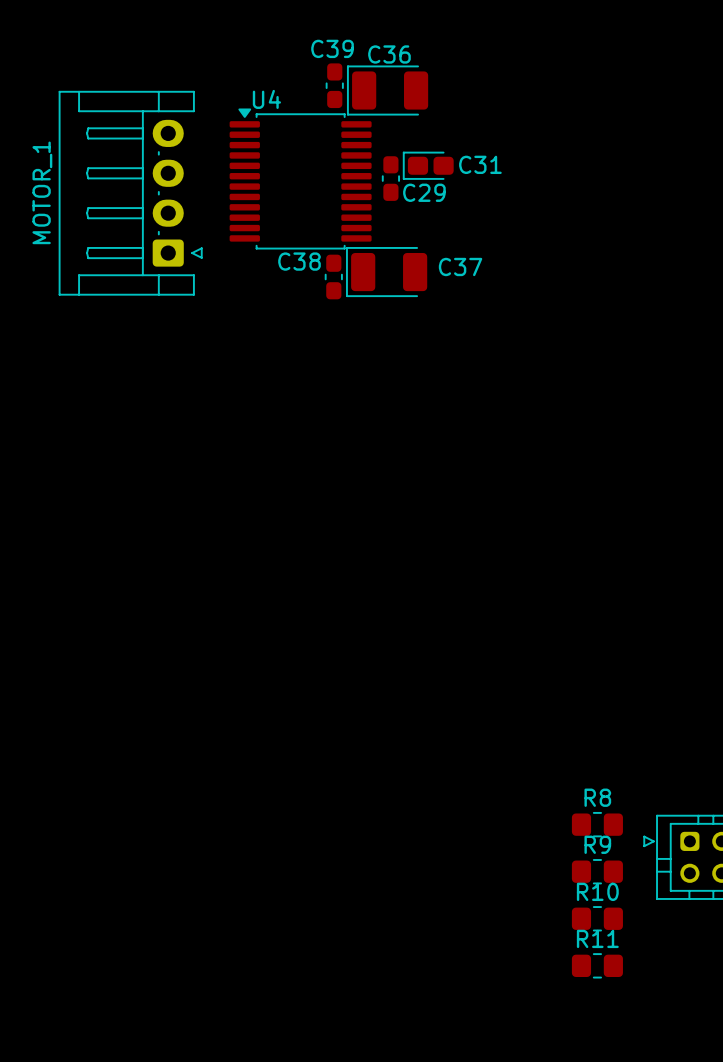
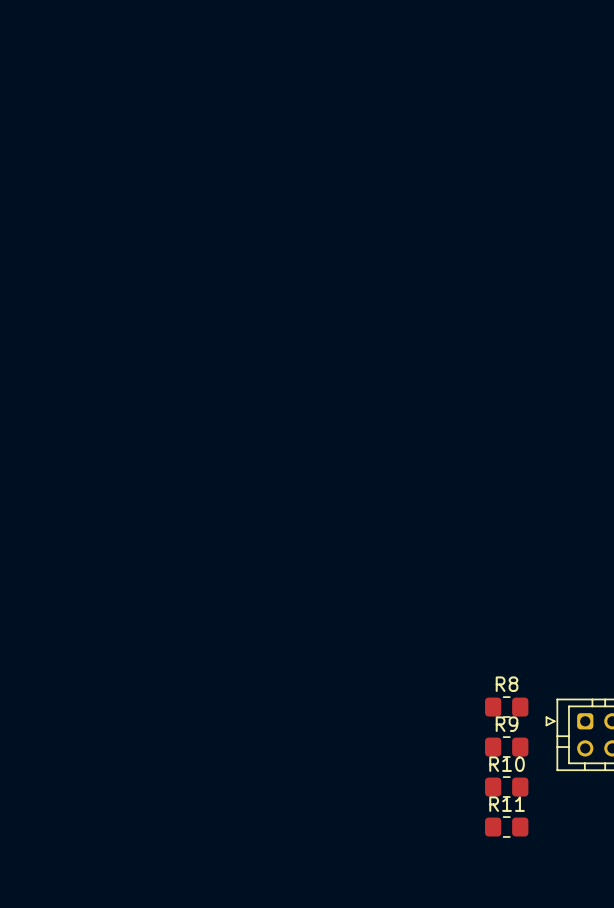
C39: (334, 85) -> none
C36: (387, 90) -> none
C31: (428, 165) -> none
C29: (390, 178) -> none
U4: (300, 179) -> none
MOTOR_1: (130, 193) -> none
C37: (386, 272) -> none
C38: (333, 276) -> none

